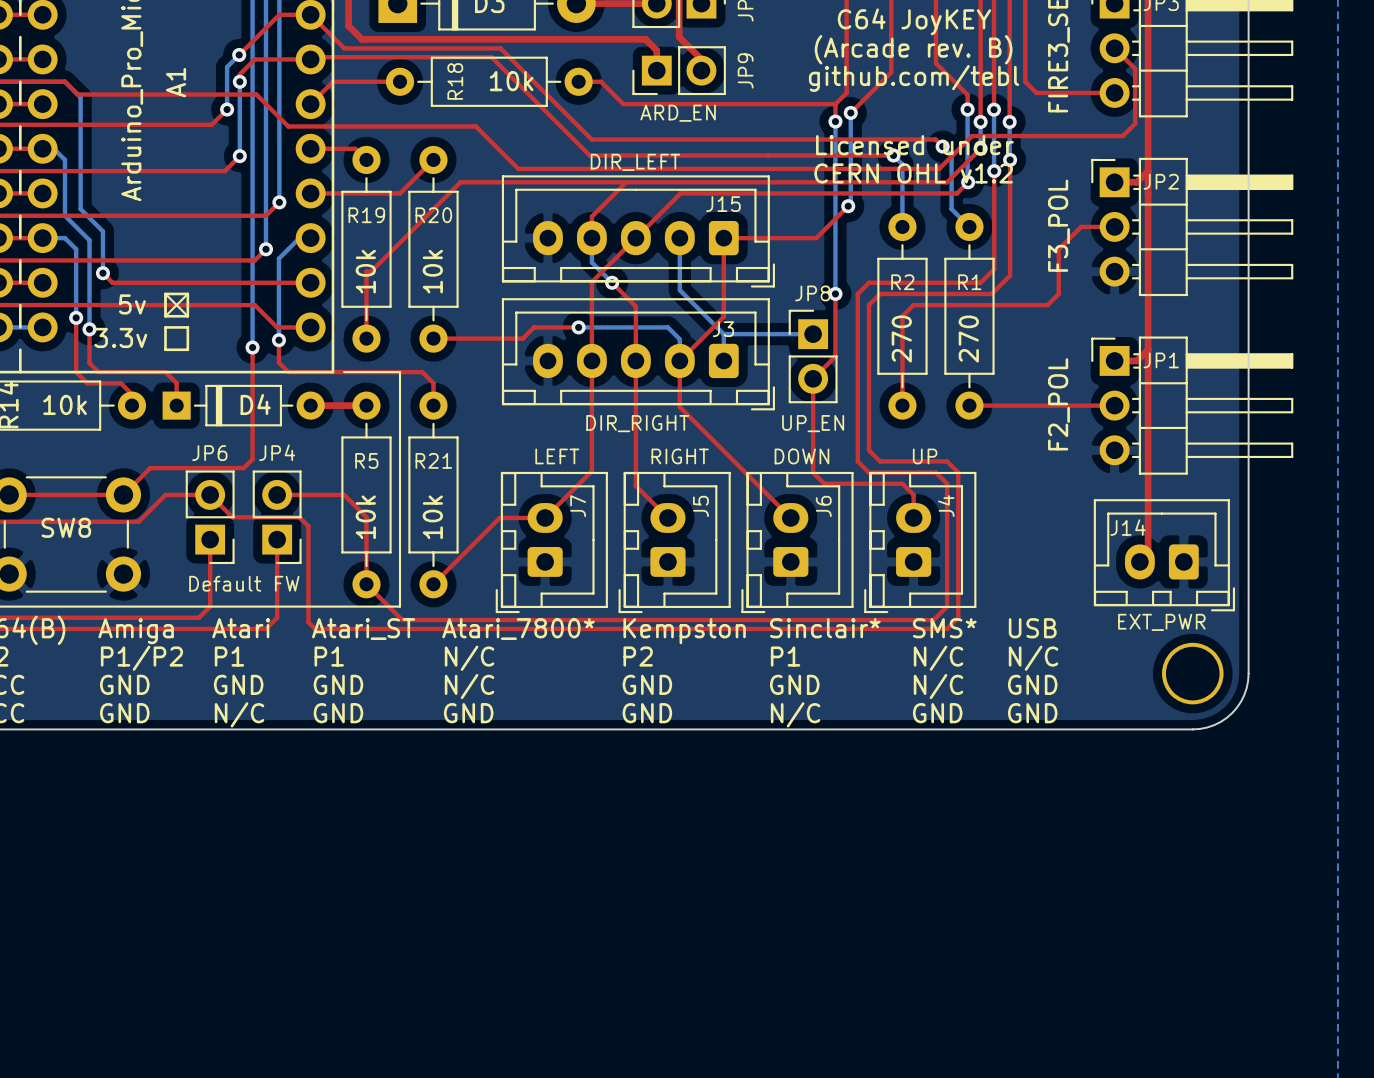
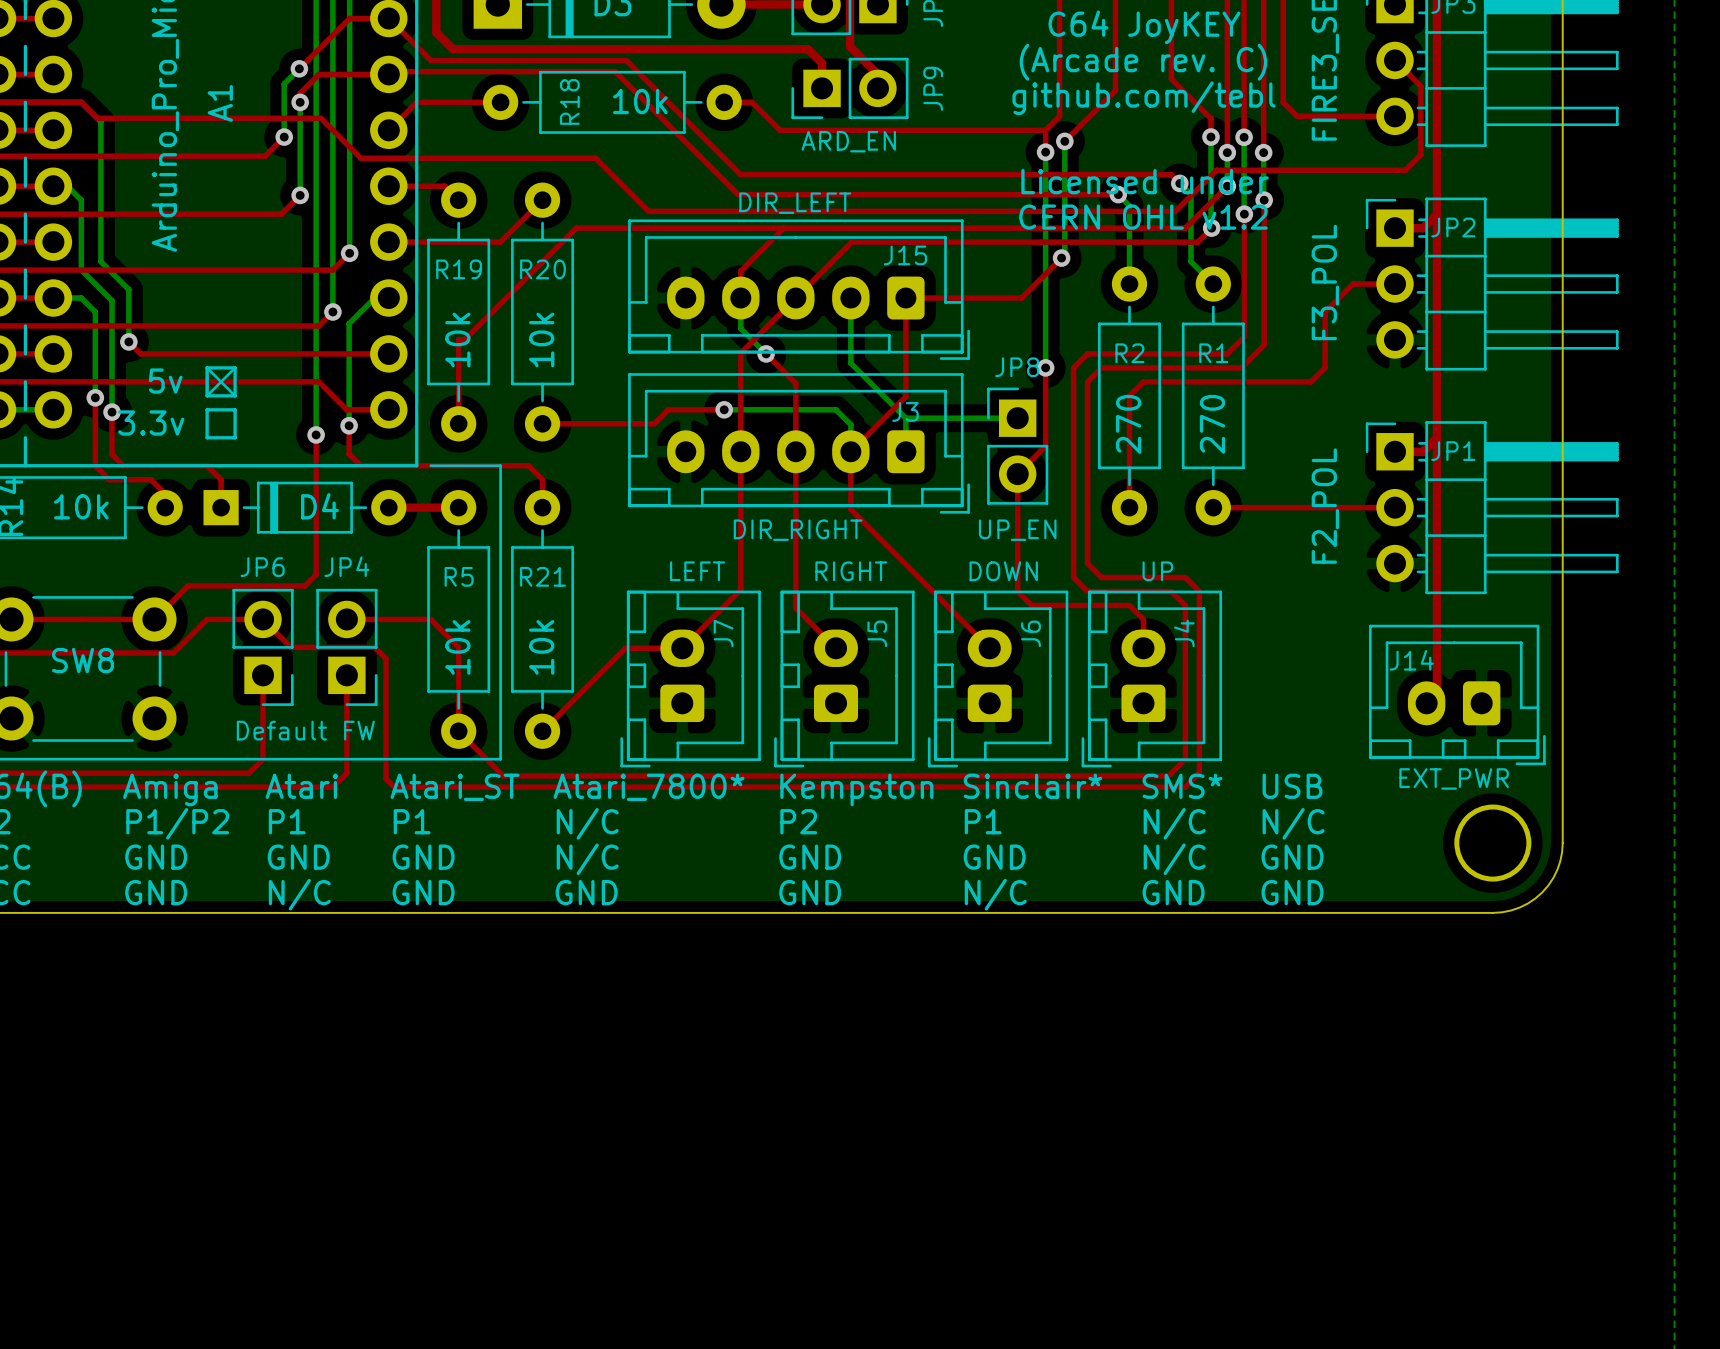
text: (Arcade rev. B) (913, 49) -> (Arcade rev. C) (1143, 62)

